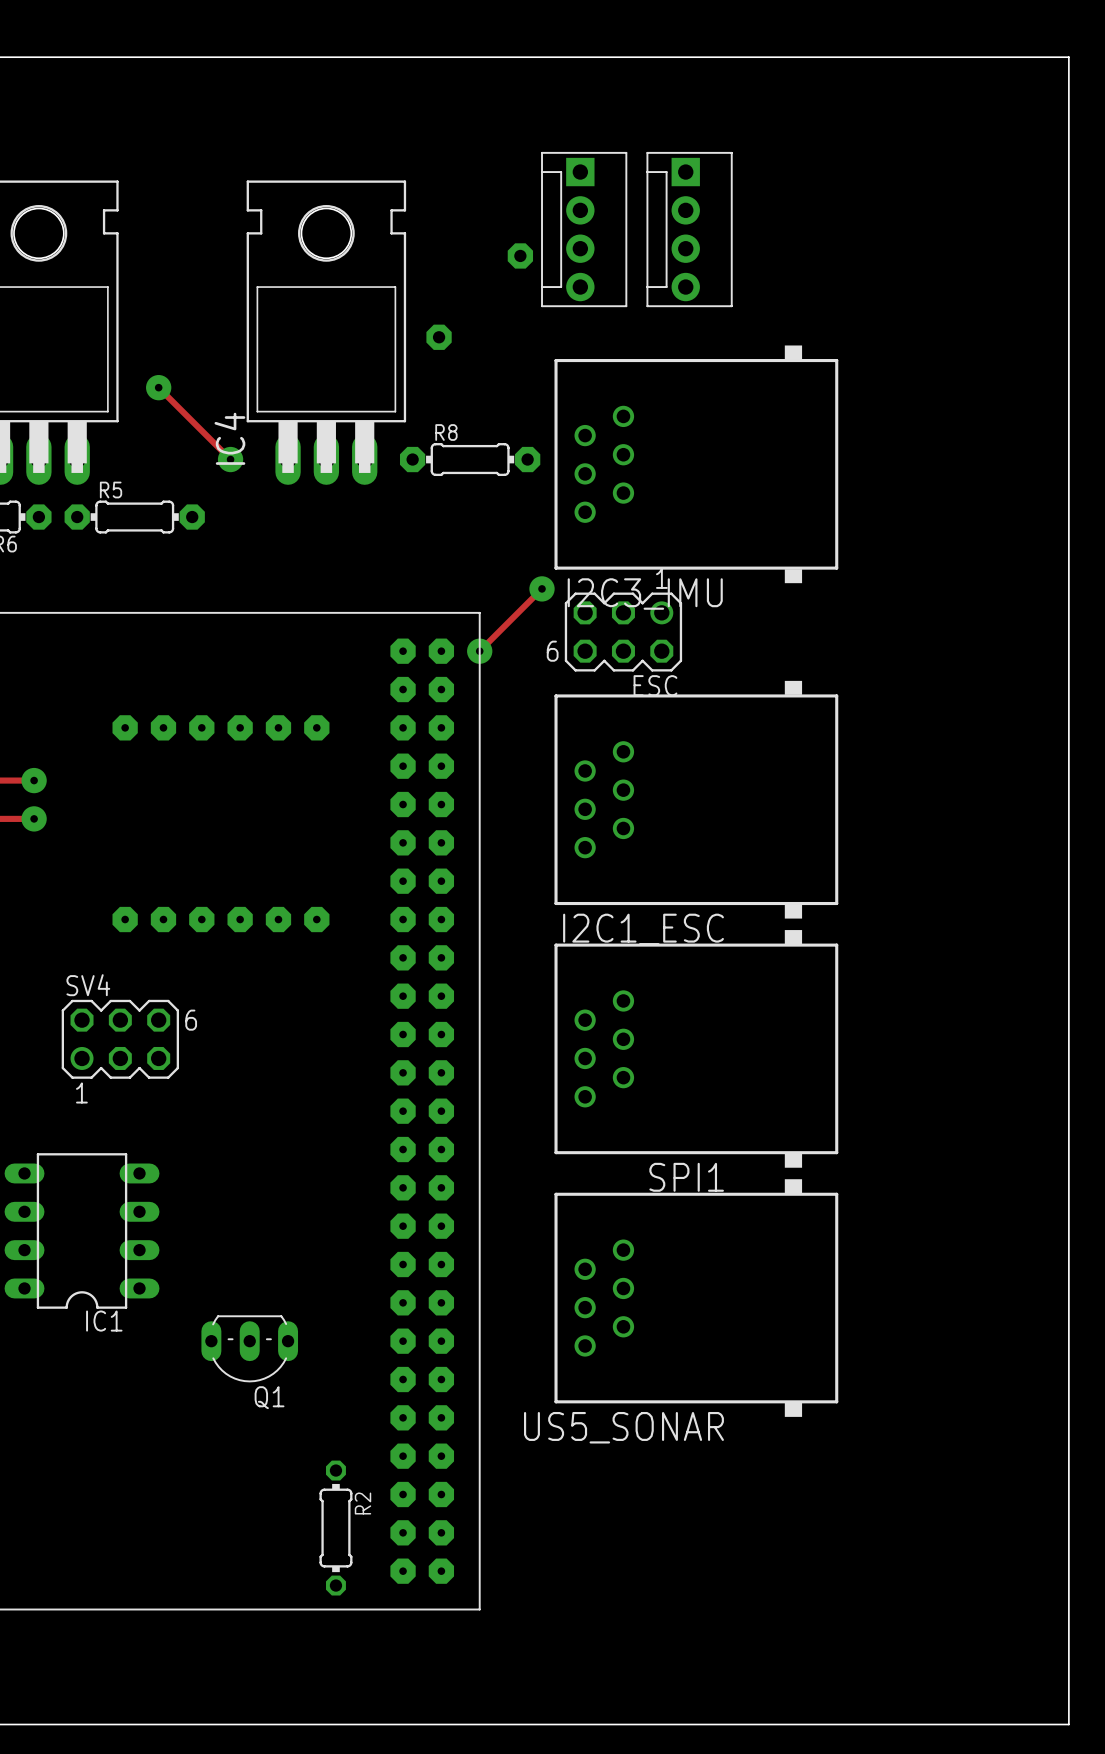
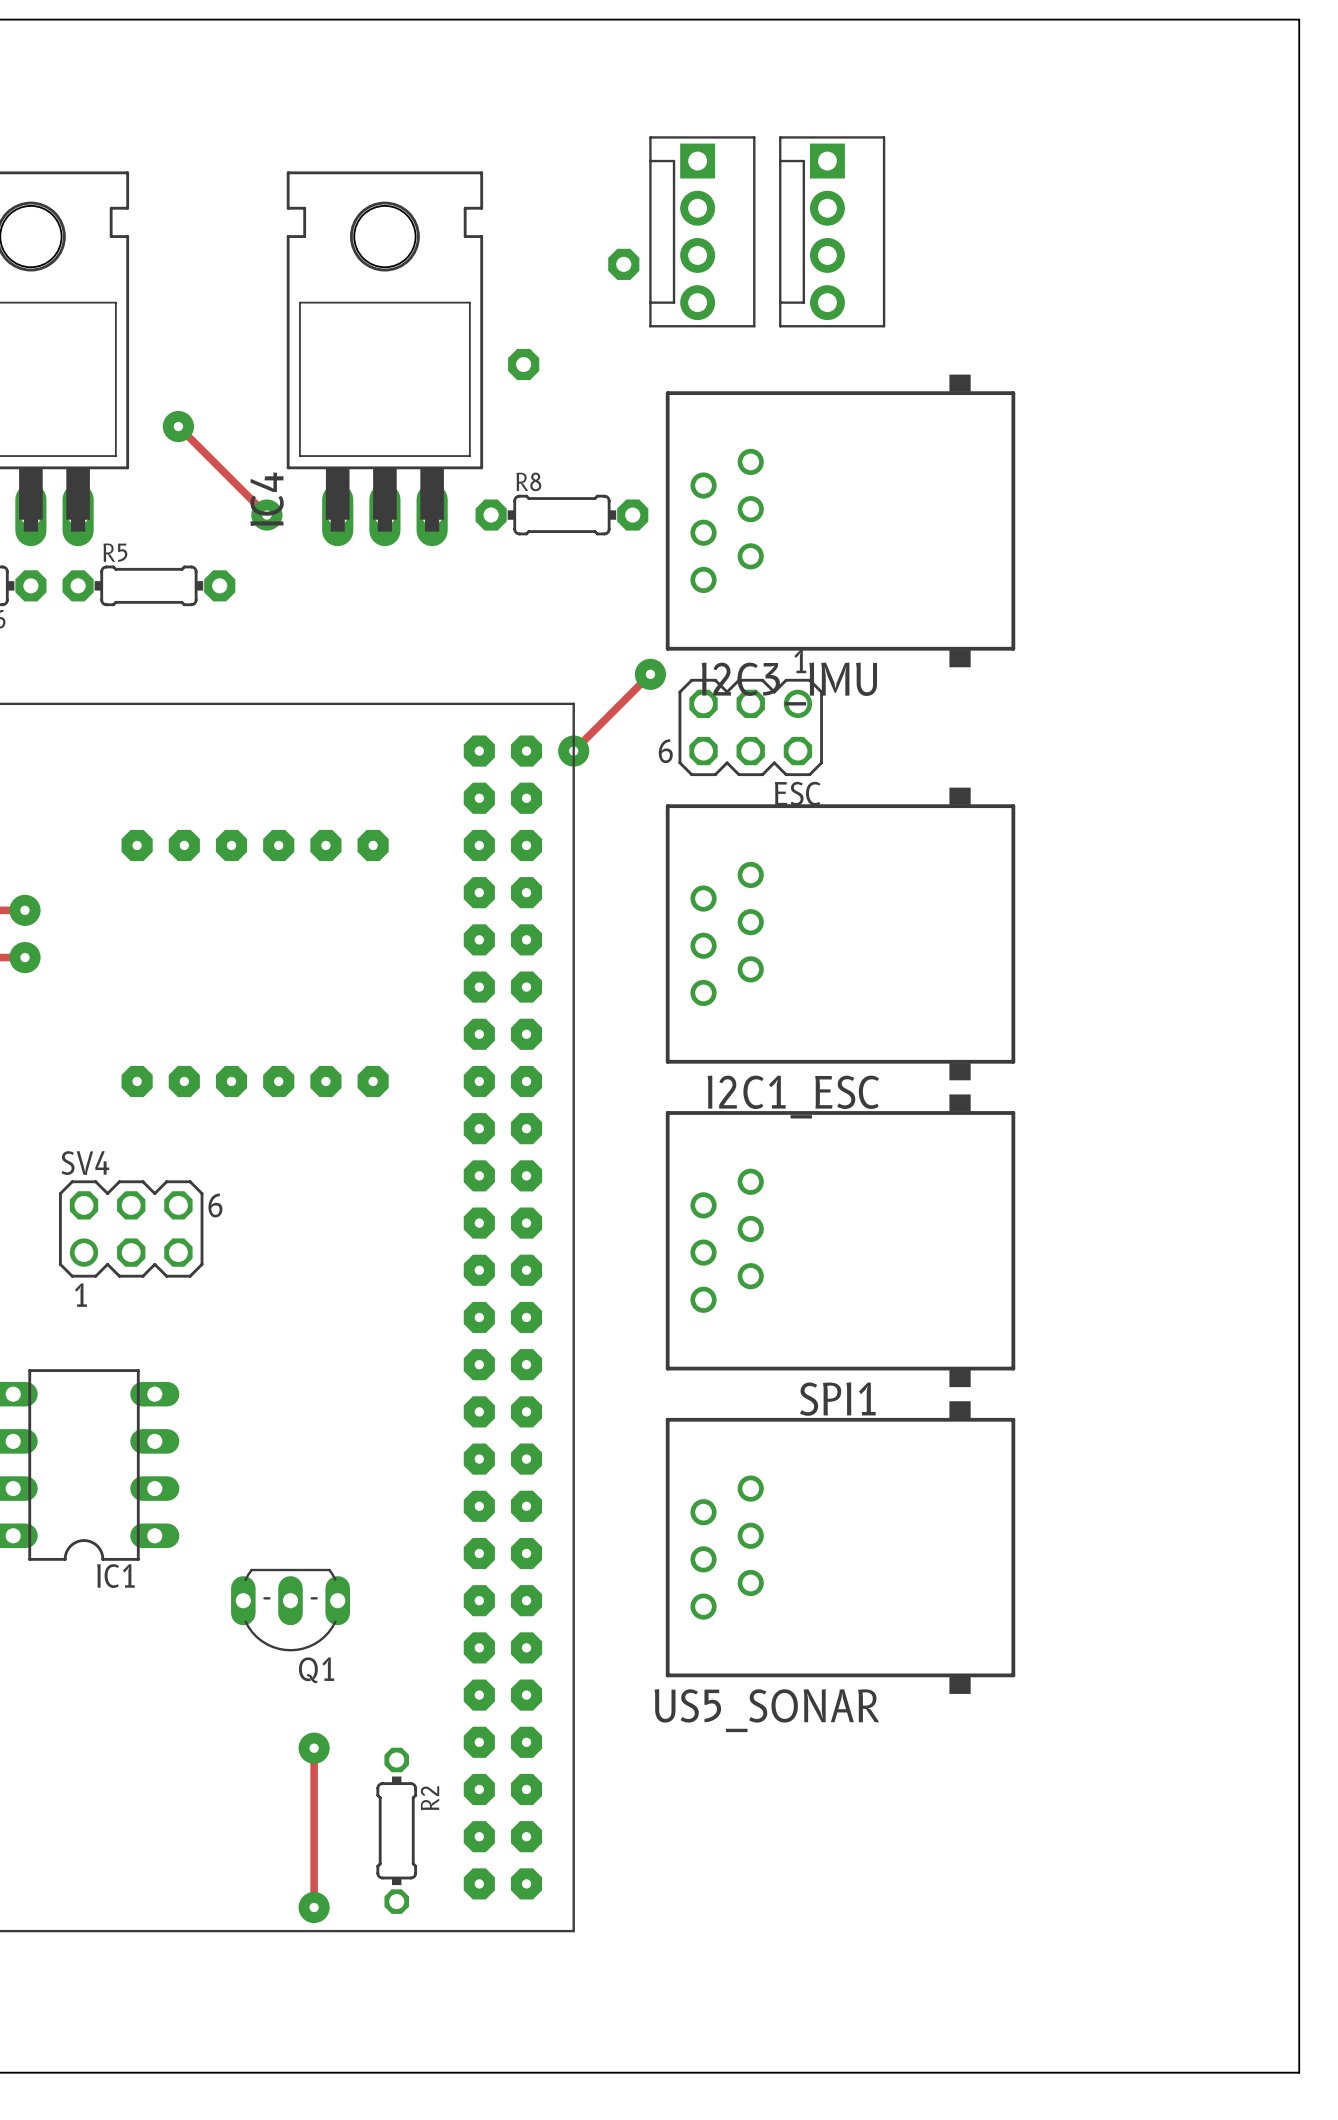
track: none -> (314, 1748) (314, 1907)
via: none -> (314, 1748)
via: none -> (314, 1907)

